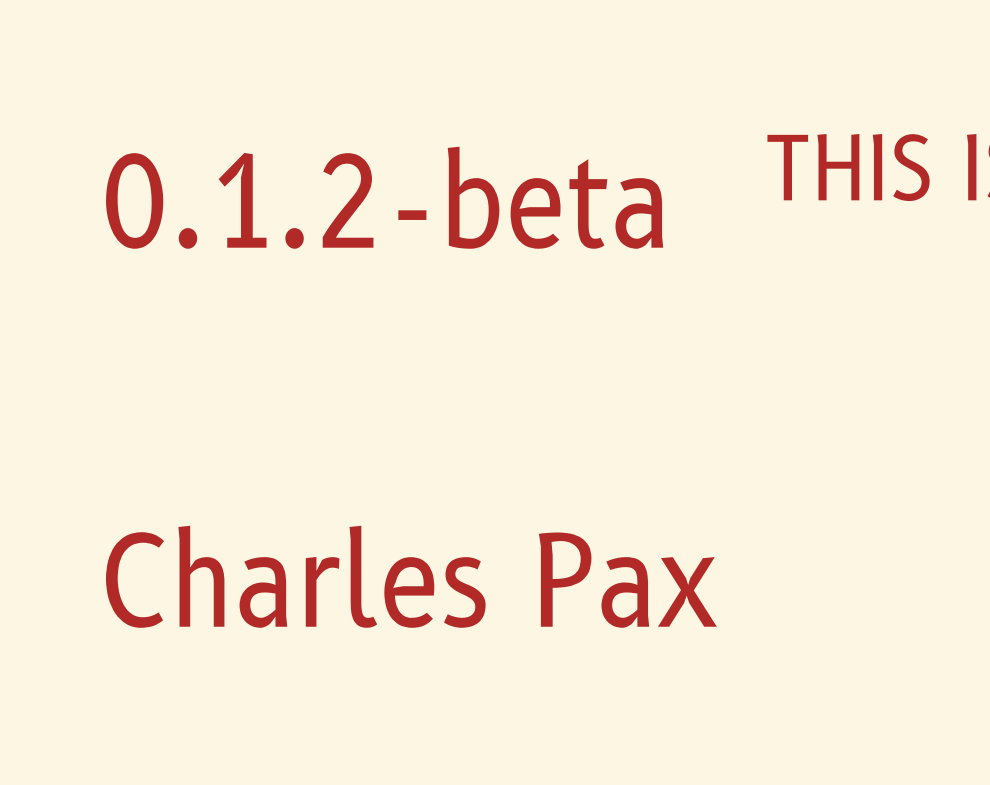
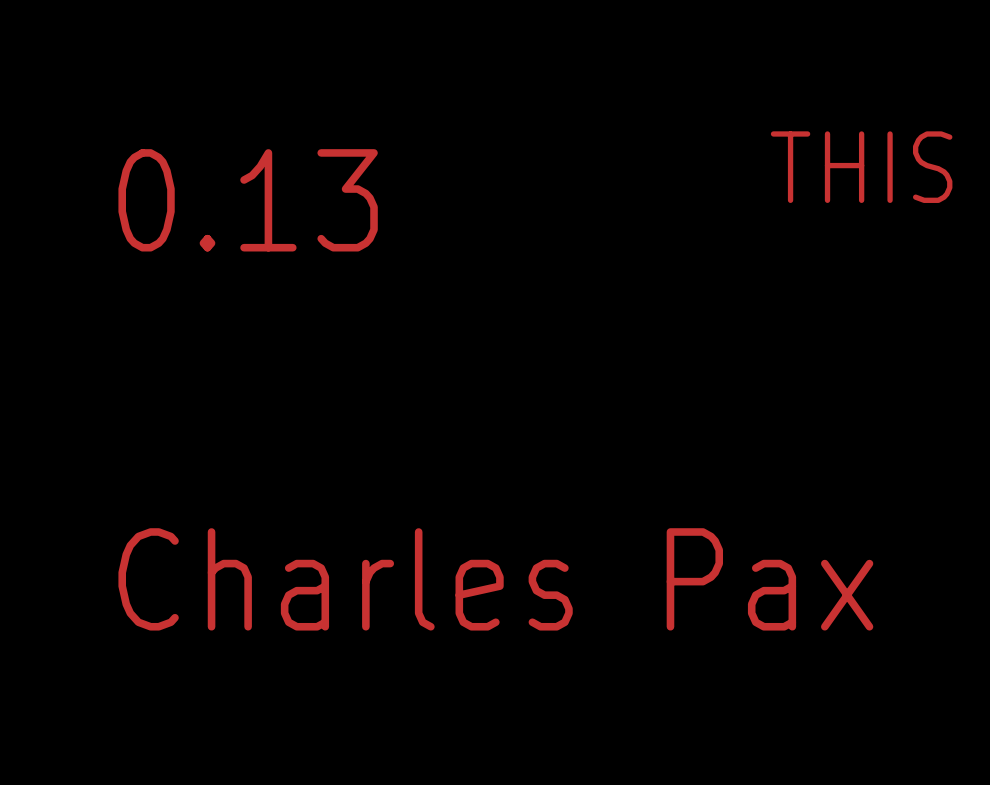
text: 0.1.2-beta (384, 197) -> 0.13 (248, 200)

